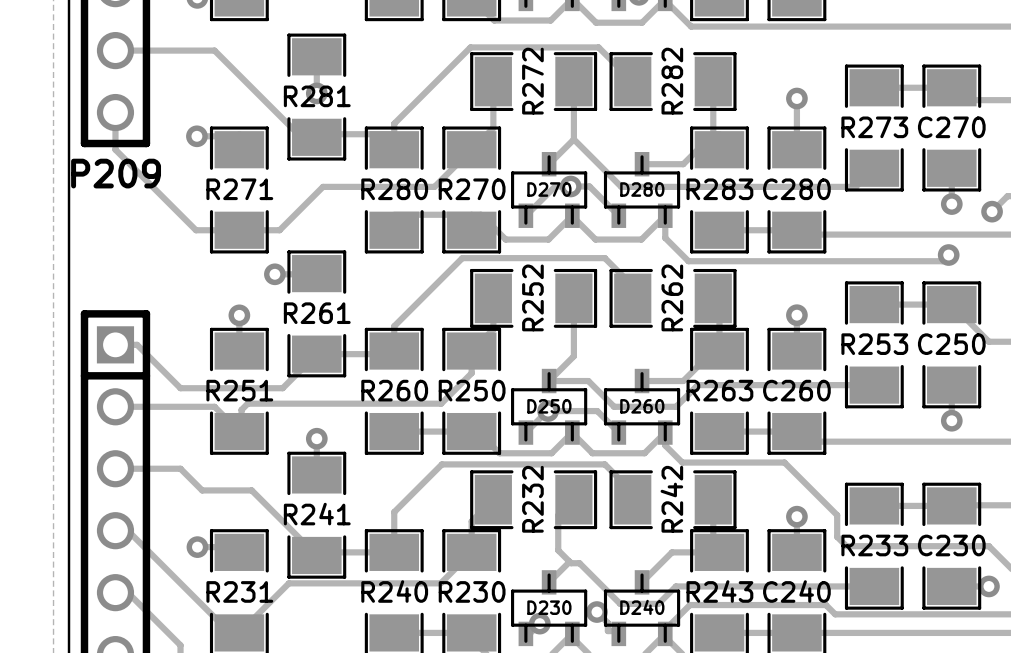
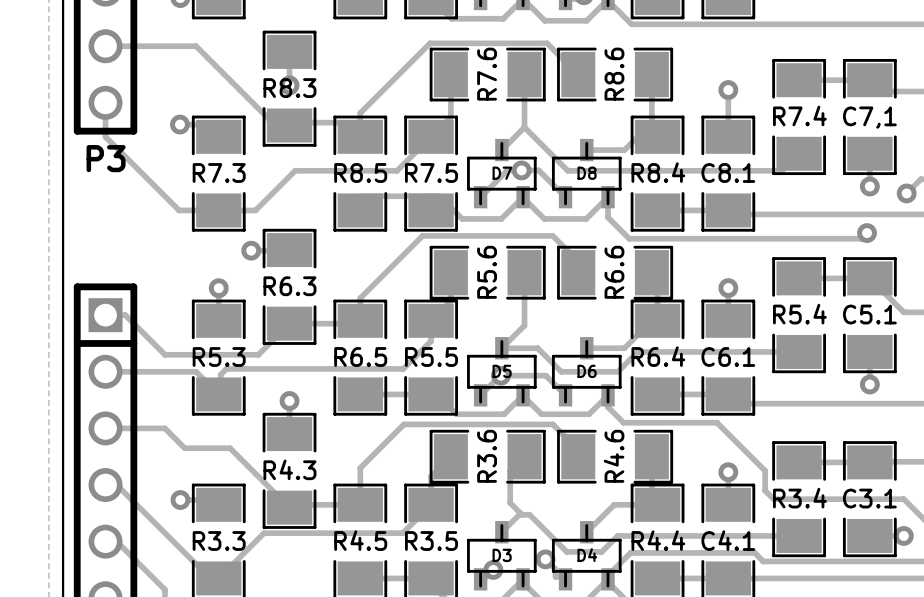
R272 name: R272 (532, 81) -> R7.6 (487, 74)
R282 name: R282 (672, 81) -> R8.6 (614, 74)
R281 name: R281 (317, 96) -> R8.3 (289, 88)
R273 name: R273 (874, 127) -> R7.4 (799, 115)
C270 name: C270 (951, 127) -> C7,1 (869, 117)
P209 name: P209 (116, 173) -> P3 (106, 158)
R271 name: R271 (239, 189) -> R7.3 (219, 172)
R280 name: R280 (394, 189) -> R8.5 (360, 172)
R270 name: R270 (472, 189) -> R7.5 (431, 172)
D270 name: D270 (549, 189) -> D7 (502, 173)
D280 name: D280 (642, 189) -> D8 (587, 173)
R283 name: R283 (719, 189) -> R8.4 (658, 172)
C280 name: C280 (796, 189) -> C8.1 (728, 172)
R252 name: R252 (532, 297) -> R5.6 (487, 272)
R262 name: R262 (672, 297) -> R6.6 (614, 272)
R261 name: R261 (317, 313) -> R6.3 (289, 286)
R253 name: R253 (874, 344) -> R5.4 (799, 314)
C250 name: C250 (951, 344) -> C5.1 (869, 314)
R251 name: R251 (239, 390) -> R5.3 (219, 356)
R260 name: R260 (394, 390) -> R6.5 (360, 356)
R250 name: R250 (472, 390) -> R5.5 (431, 356)
R263 name: R263 (719, 390) -> R6.4 (658, 356)
C260 name: C260 (796, 390) -> C6.1 (728, 356)
D250 name: D250 (549, 406) -> D5 (502, 371)
D260 name: D260 (642, 406) -> D6 (587, 371)
R232 name: R232 (532, 499) -> R3.6 (487, 456)
R242 name: R242 (671, 499) -> R4.6 (614, 456)
R241 name: R241 (317, 514) -> R4.3 (289, 469)
R233 name: R233 (874, 545) -> R3.4 (799, 498)
C230 name: C230 (951, 545) -> C3.1 (869, 498)
R231 name: R231 (239, 591) -> R3.3 (219, 541)
R240 name: R240 (394, 591) -> R4.5 (360, 540)
R230 name: R230 (472, 591) -> R3.5 (431, 541)
R243 name: R243 (719, 591) -> R4.4 (658, 540)
C240 name: C240 (796, 591) -> C4.1 (728, 540)
D230 name: D230 (549, 607) -> D3 (502, 555)
D240 name: D240 (642, 607) -> D4 (587, 555)

